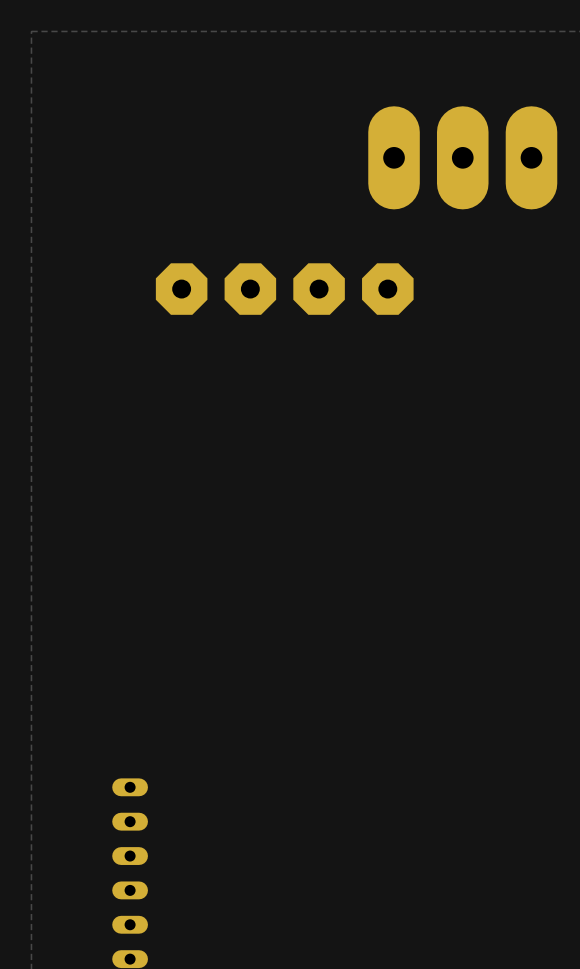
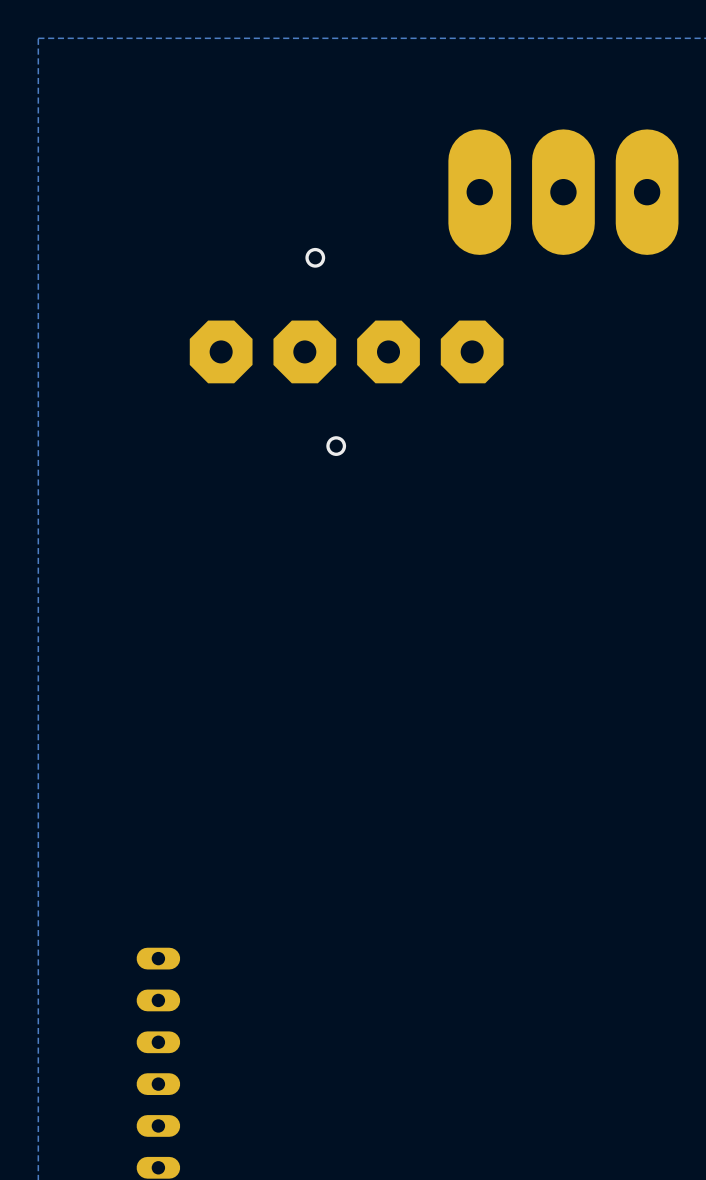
via: none -> (315, 257)
via: none -> (336, 446)

